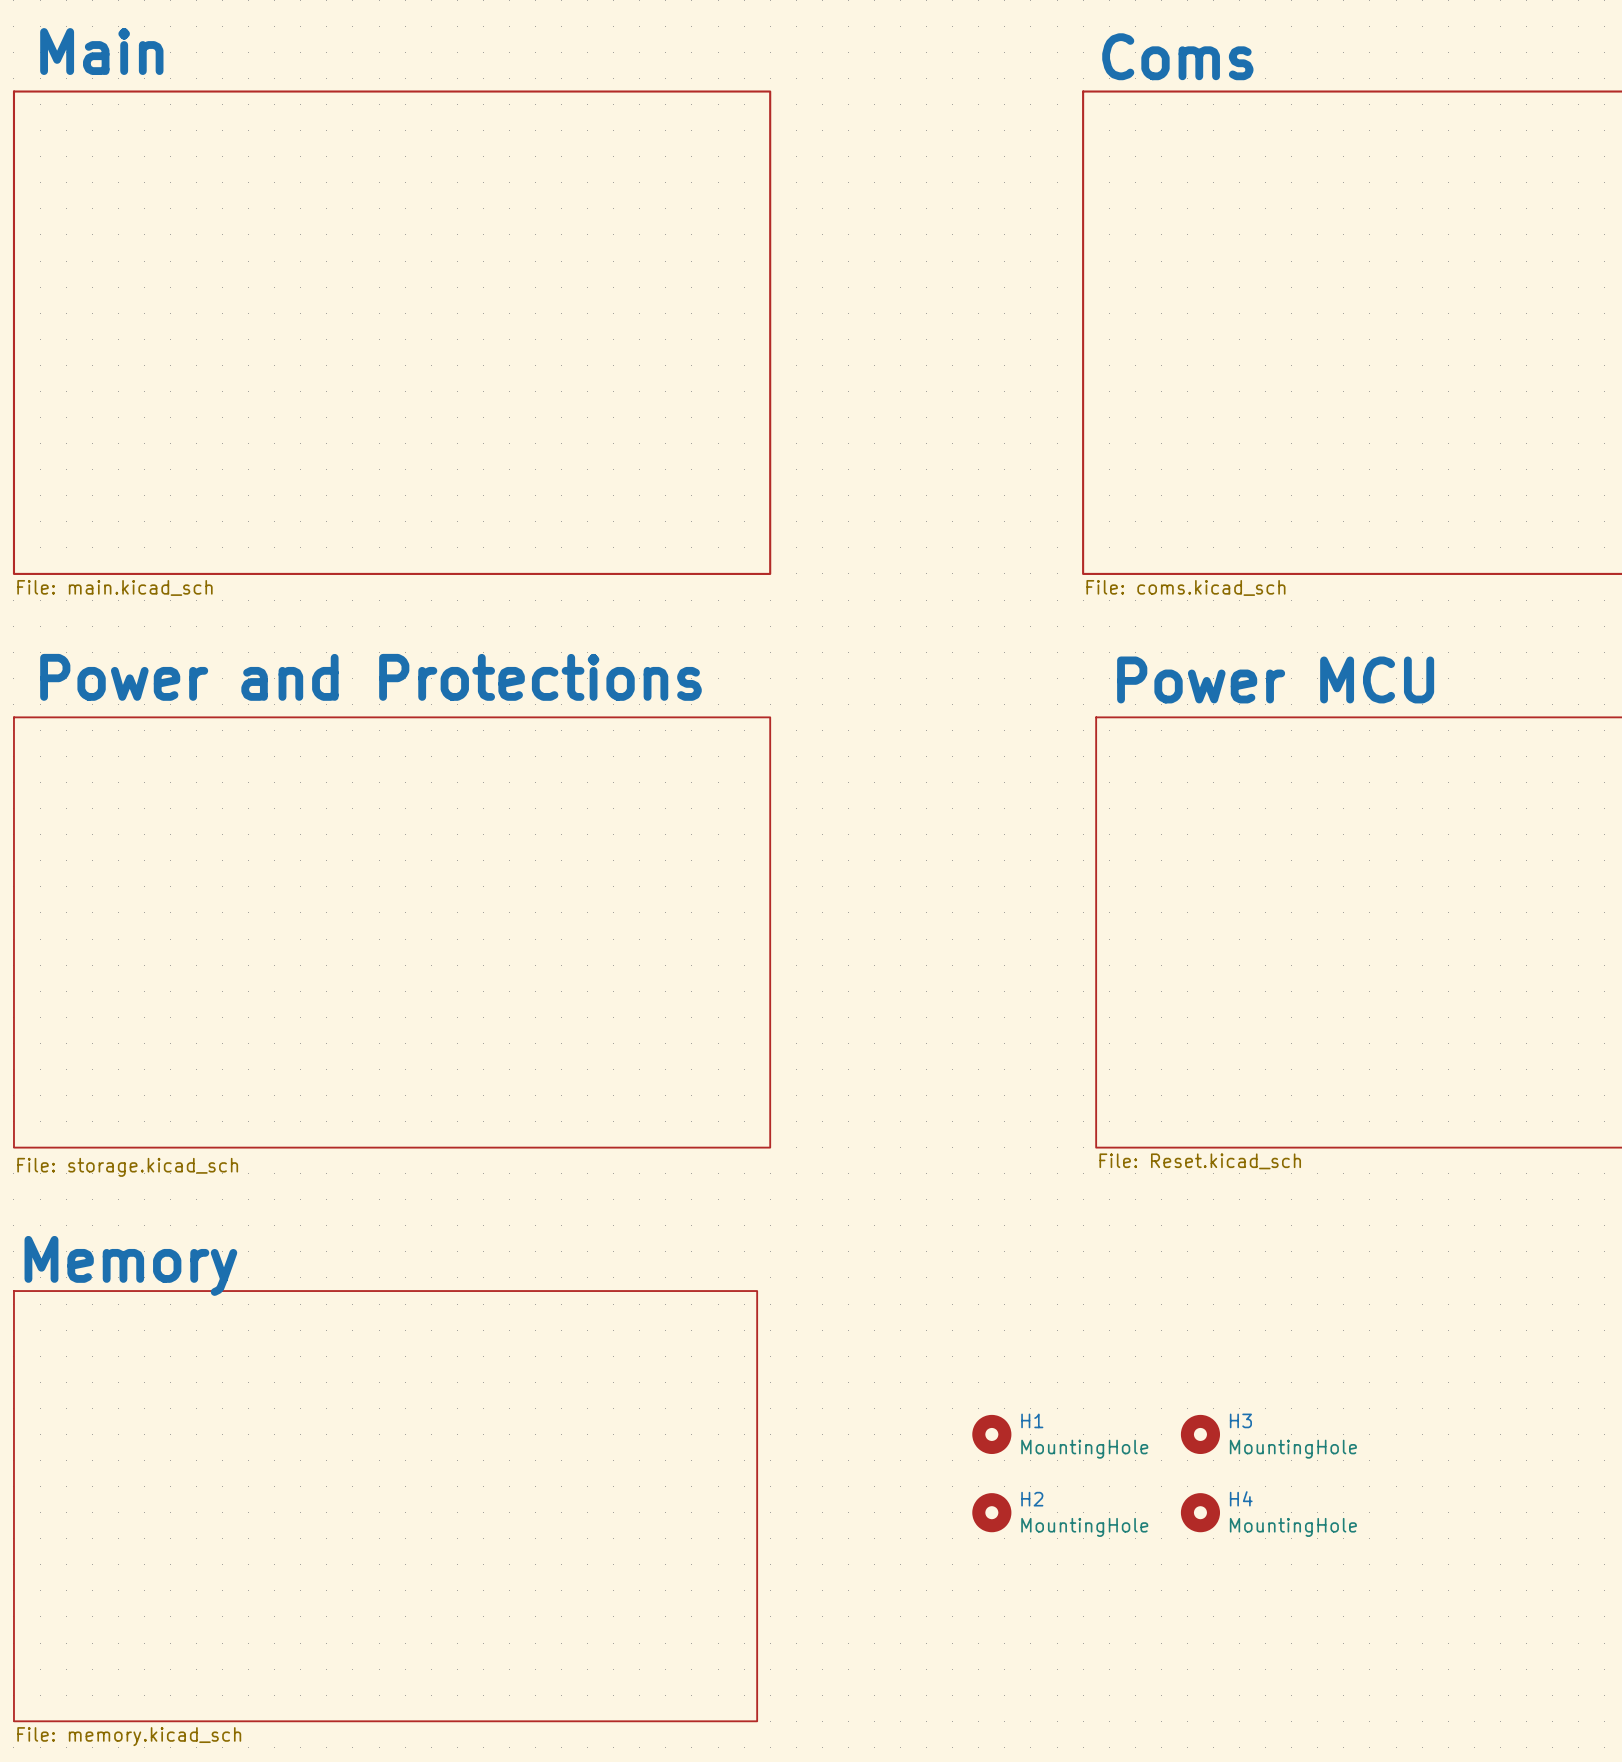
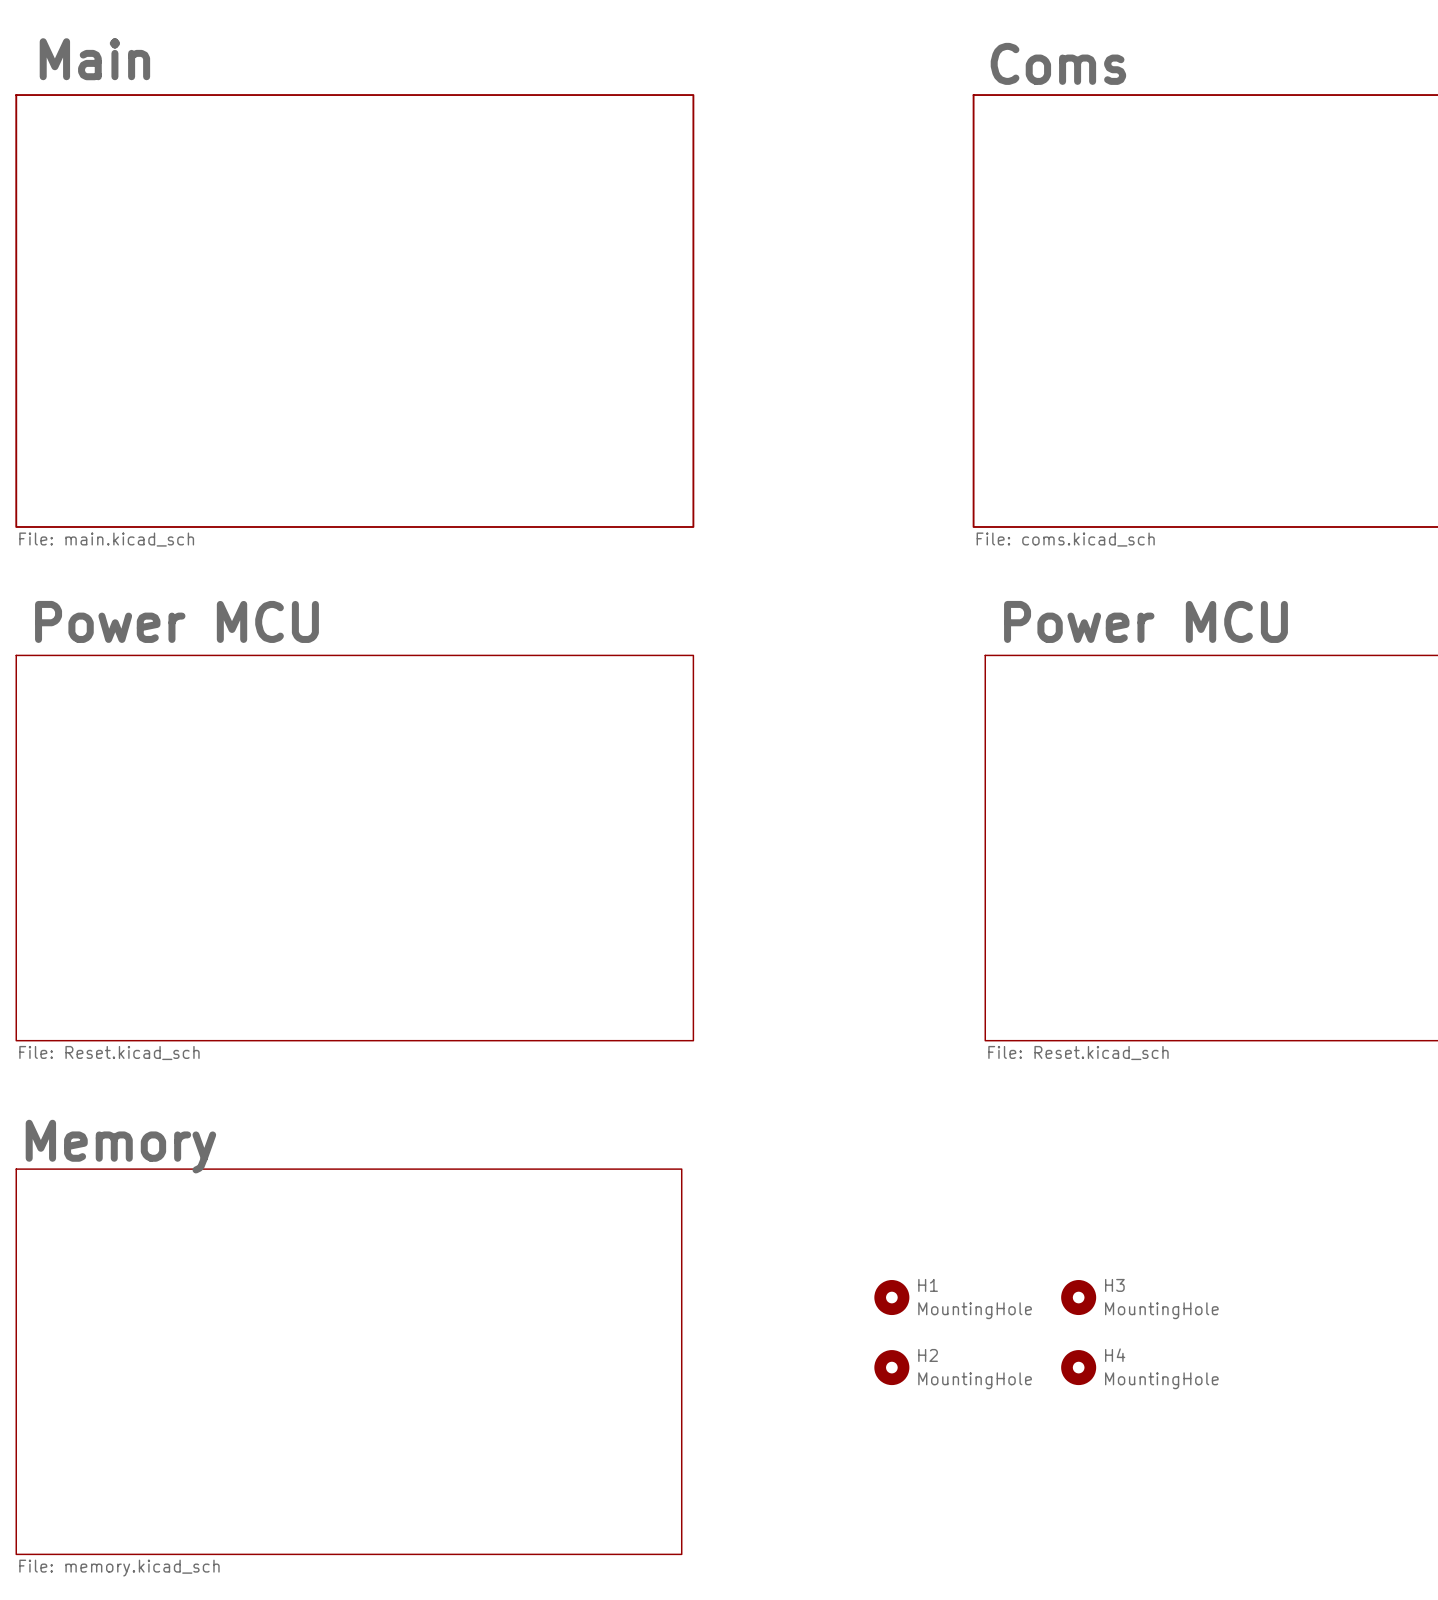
sheet Power and Protections name: Power and Protections (370, 677) -> Power MCU (176, 621)
sheet Power and Protections value: File: storage.kicad_sch (127, 1167) -> File: Reset.kicad_sch (109, 1053)

